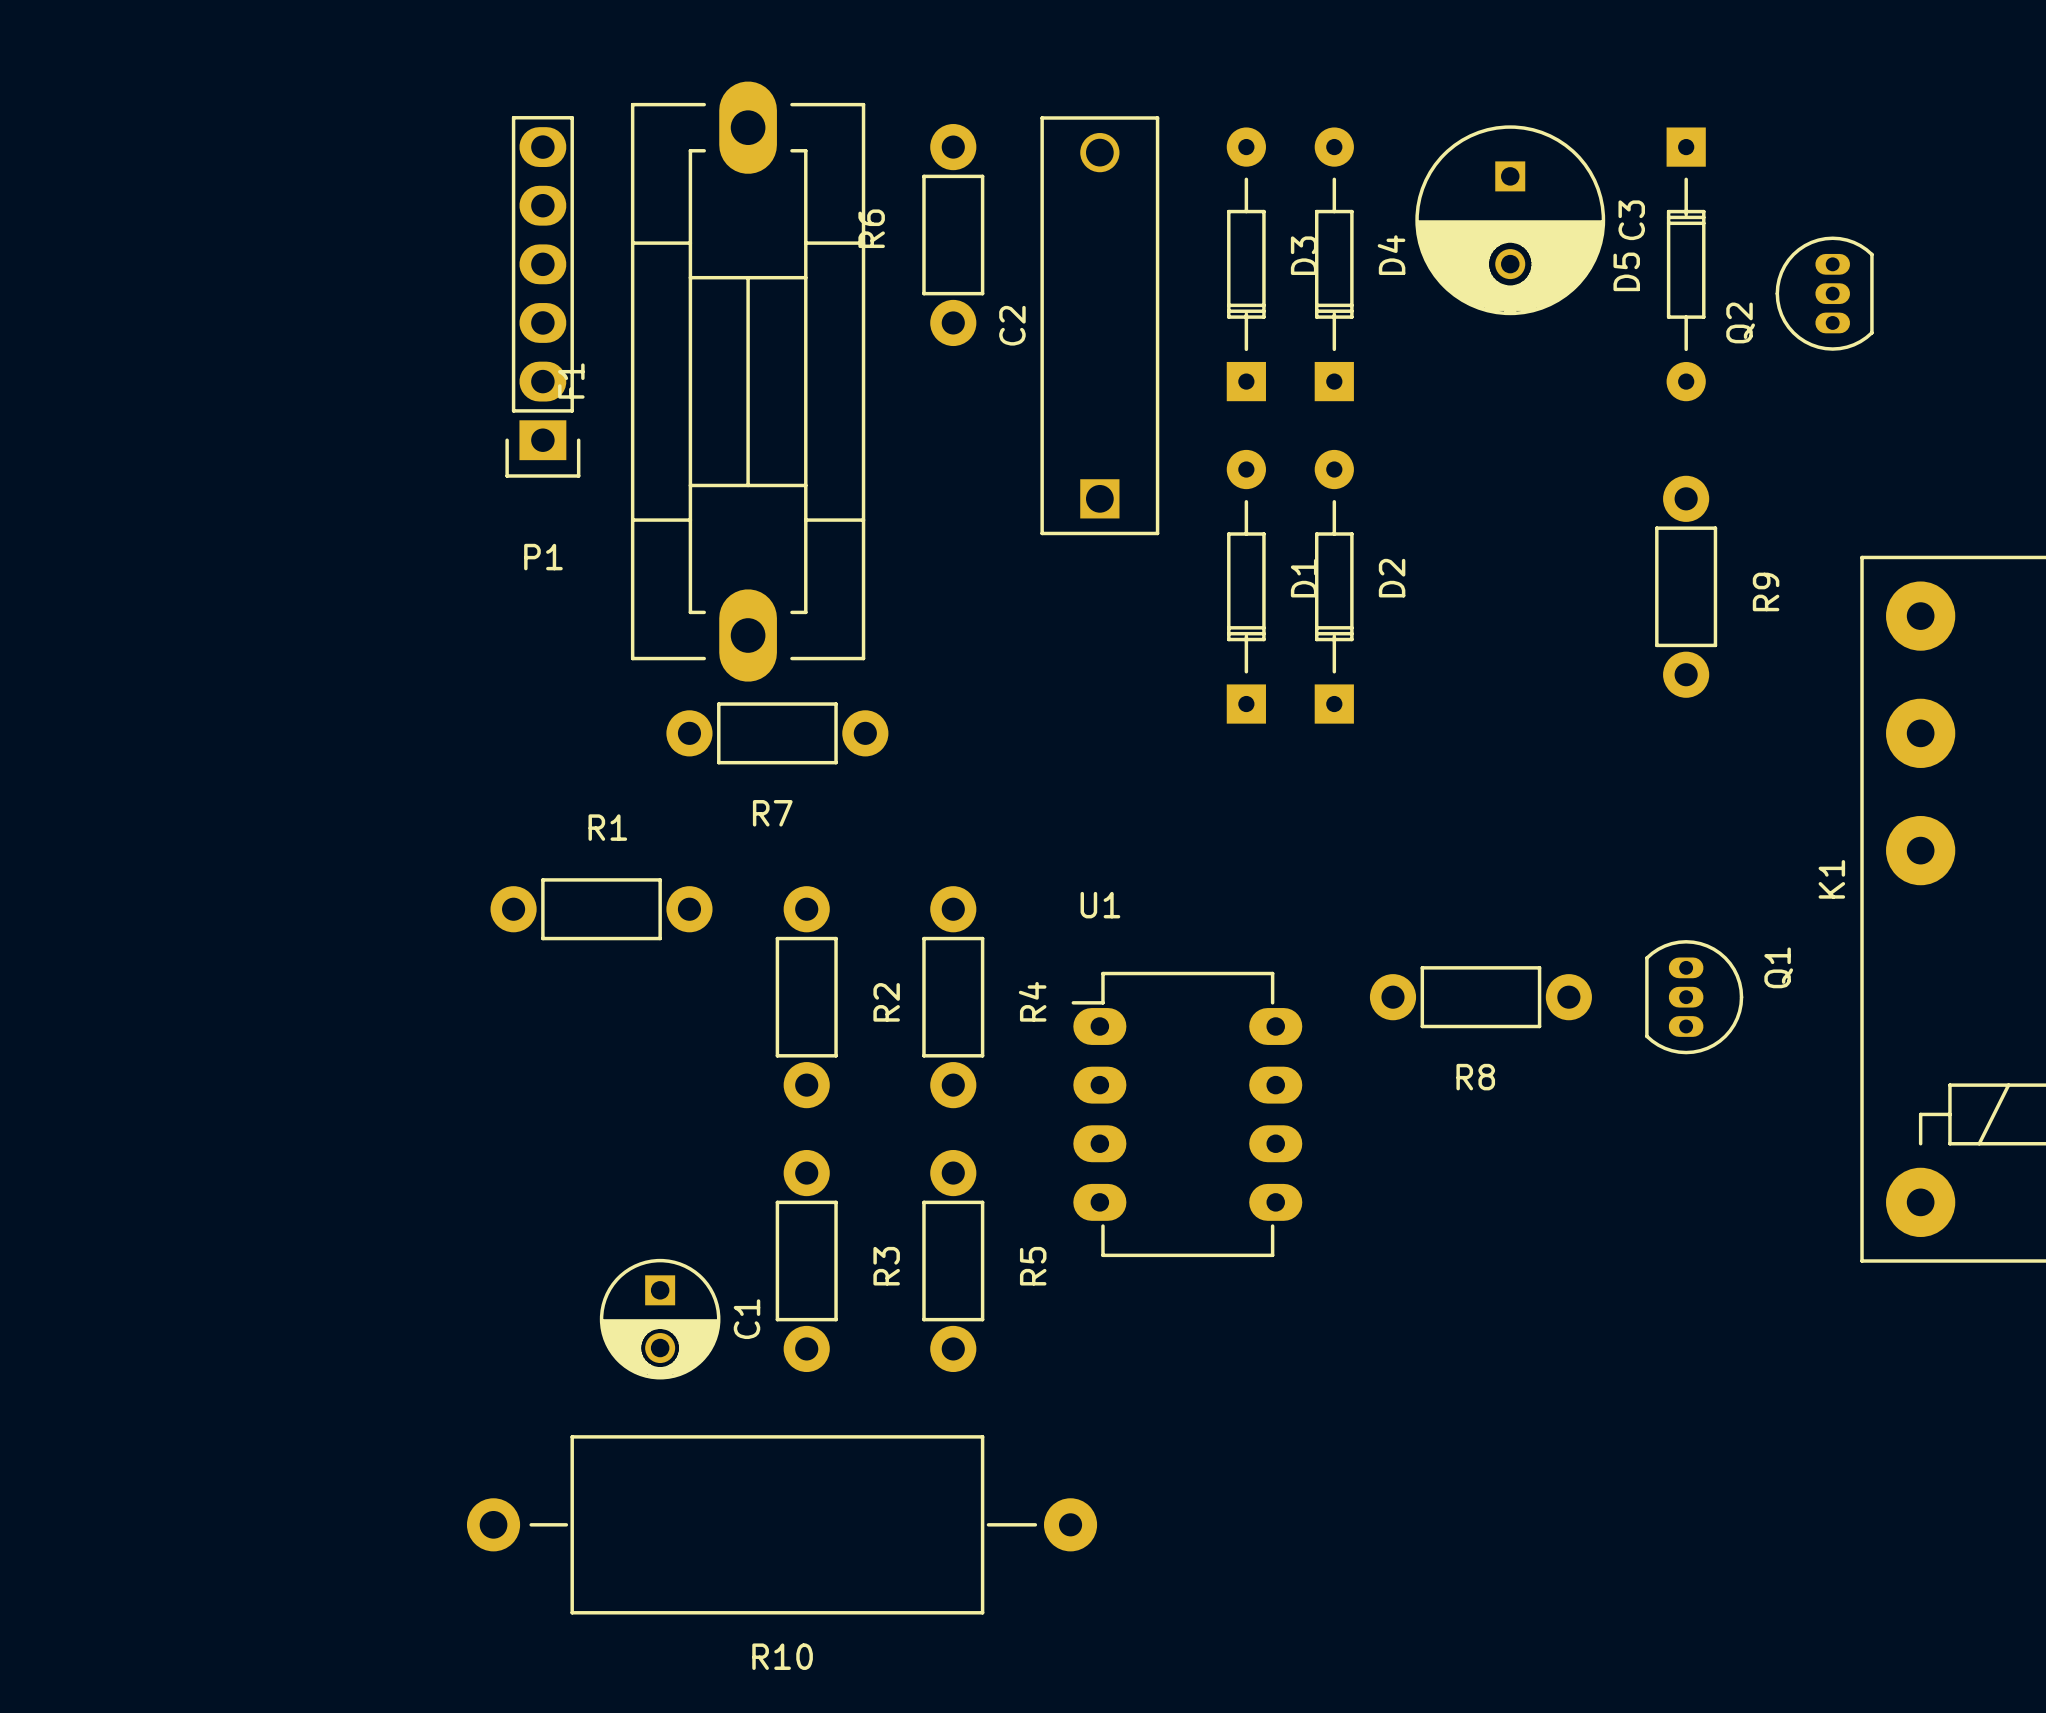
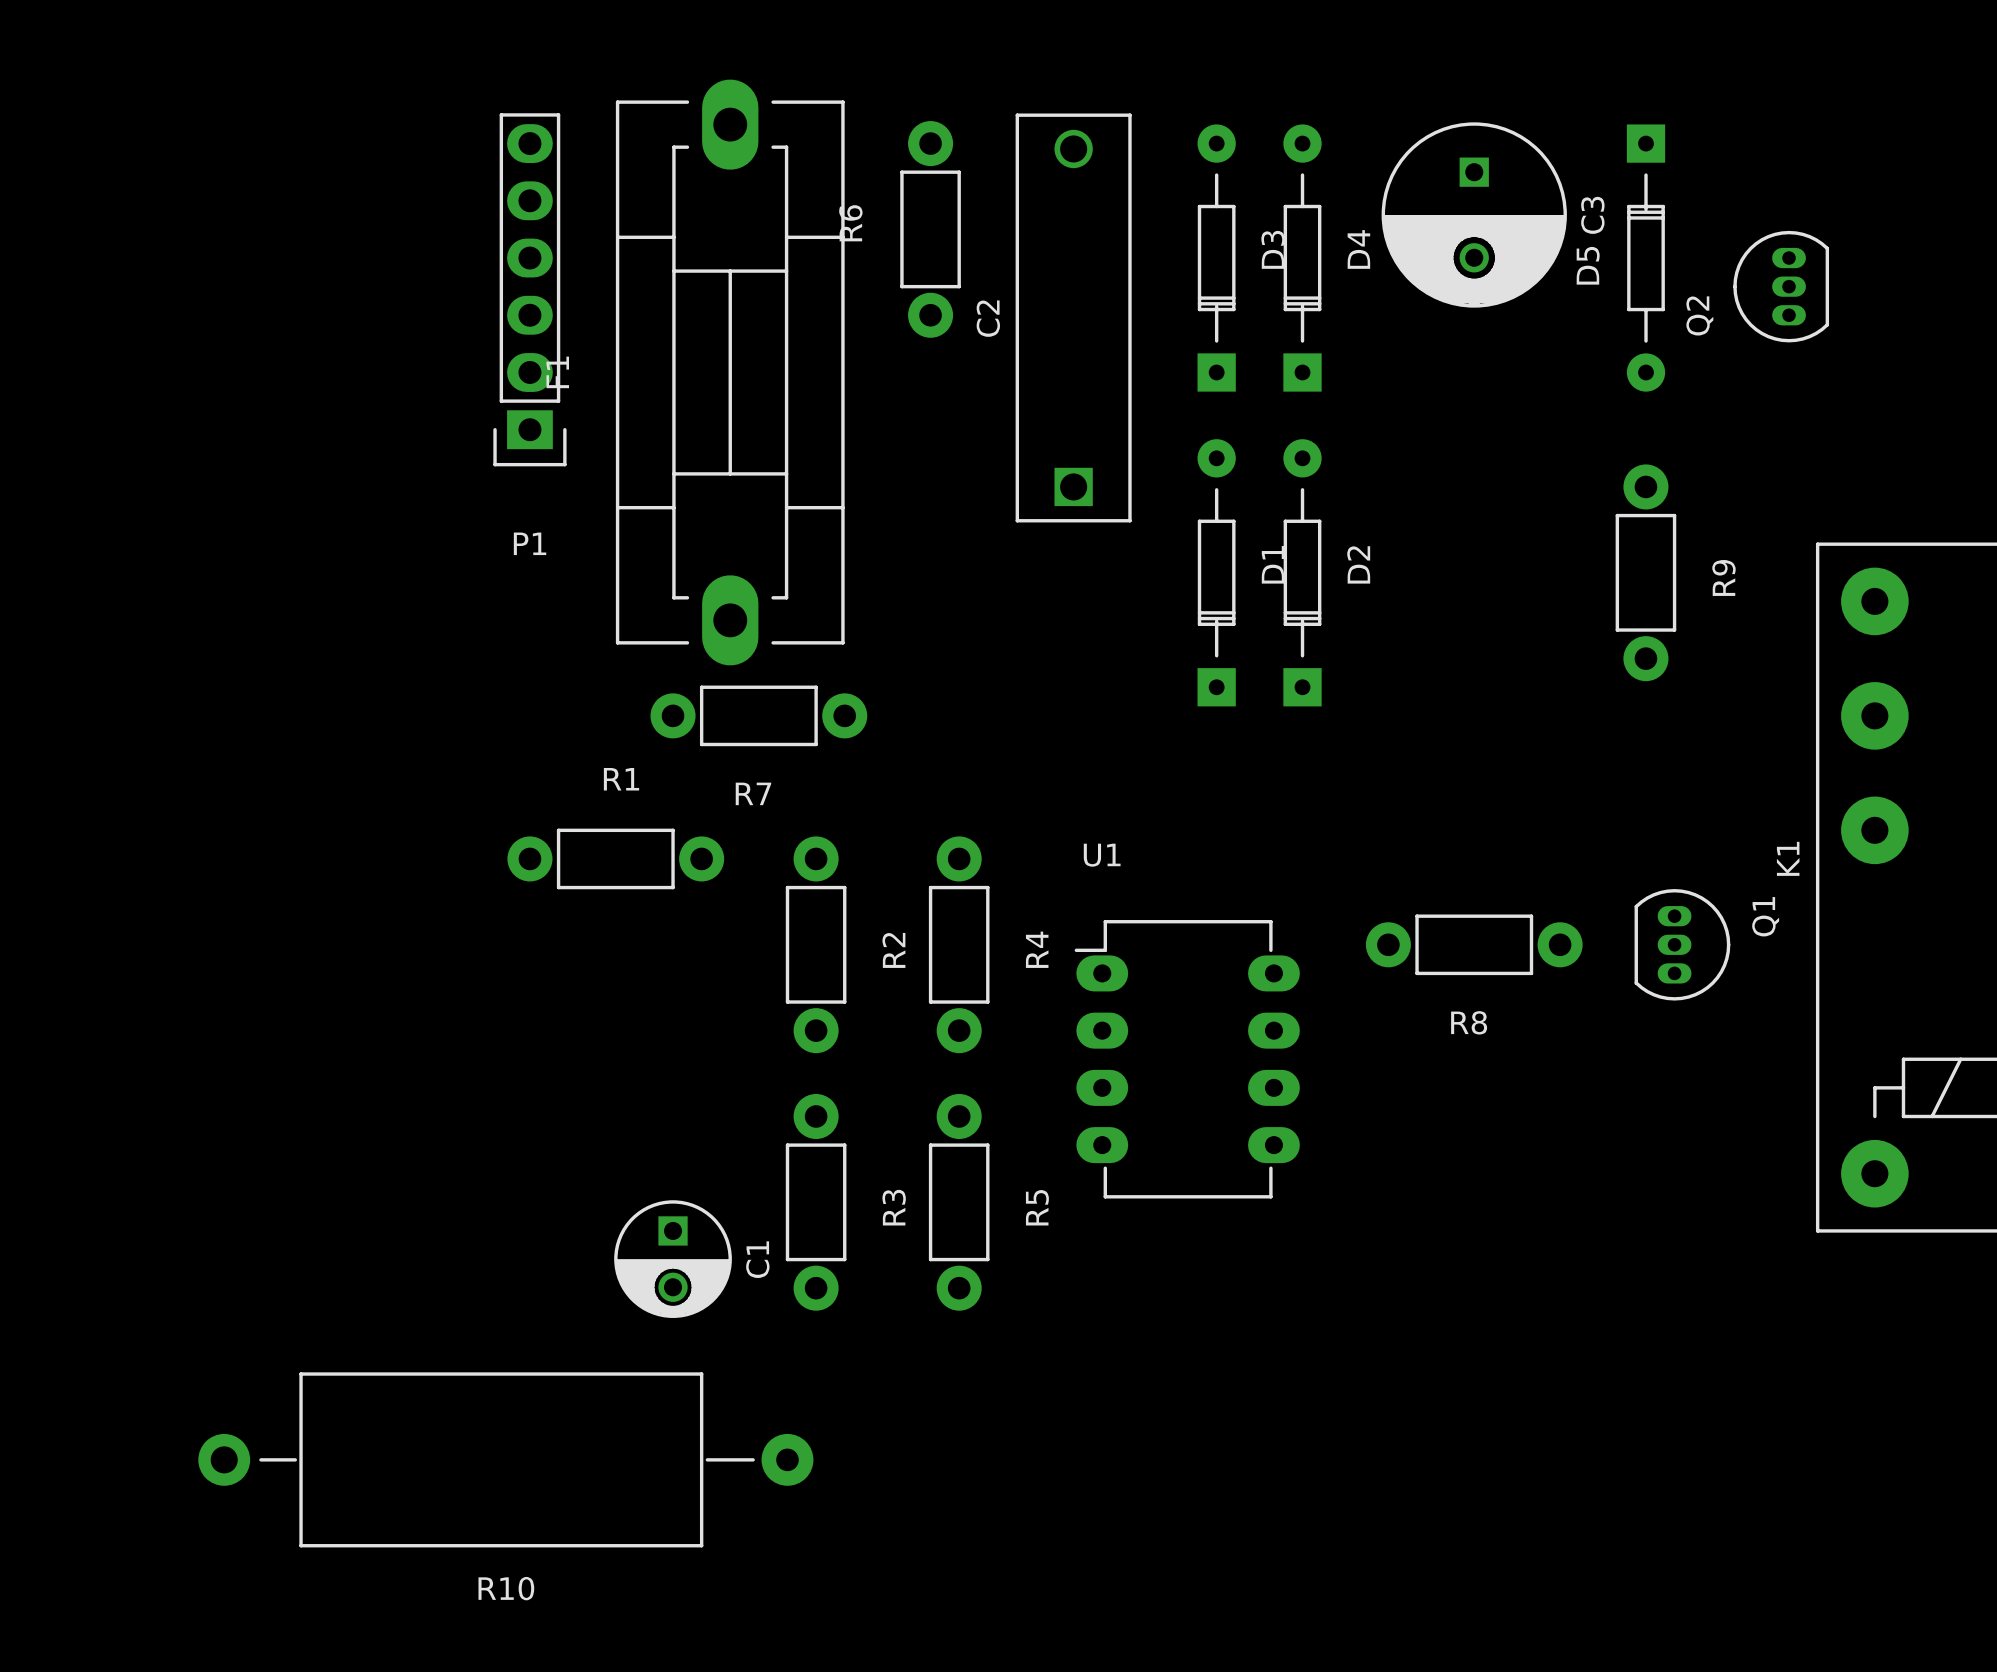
R1 position: (601, 909) -> (615, 858)
R2 position: (806, 997) -> (816, 944)
R4 position: (953, 997) -> (959, 944)
R8 position: (1480, 997) -> (1474, 944)
Q1 position: (1694, 997) -> (1682, 944)
U1 position: (1186, 1114) -> (1187, 1059)
R3 position: (806, 1261) -> (816, 1202)
R5 position: (953, 1261) -> (959, 1202)
C1 position: (660, 1319) -> (673, 1259)
R10 position: (782, 1524) -> (505, 1459)

